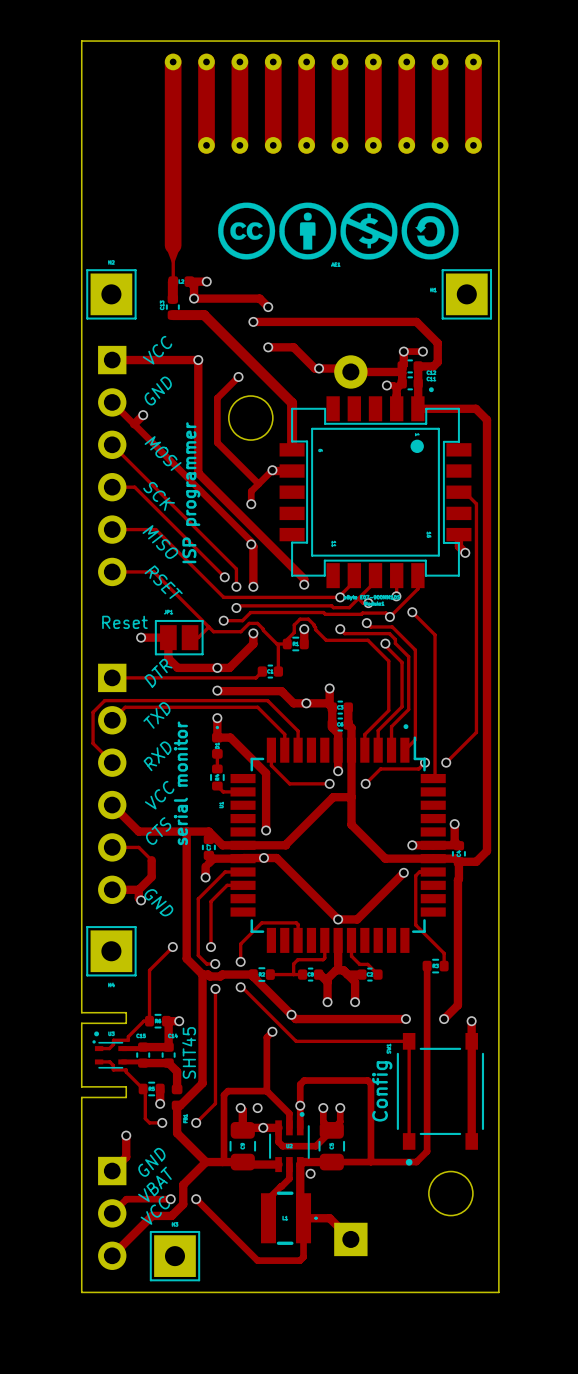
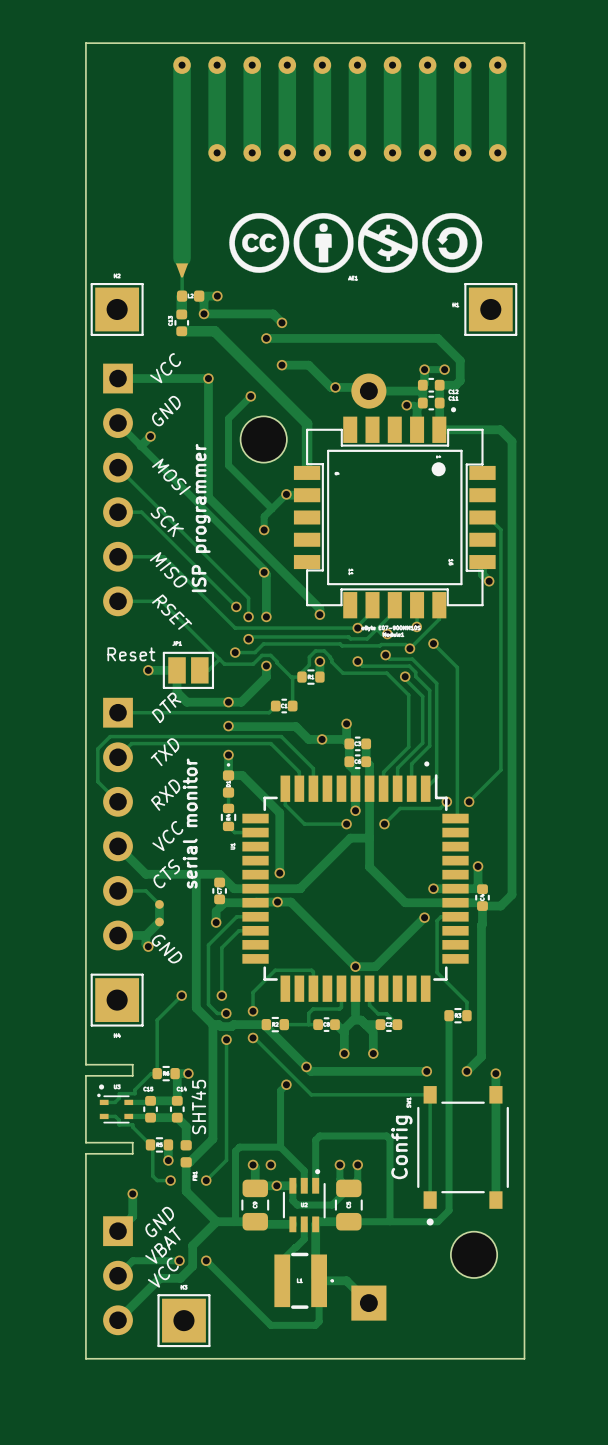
via: (300, 1105) -> none
via: (310, 1173) -> none

